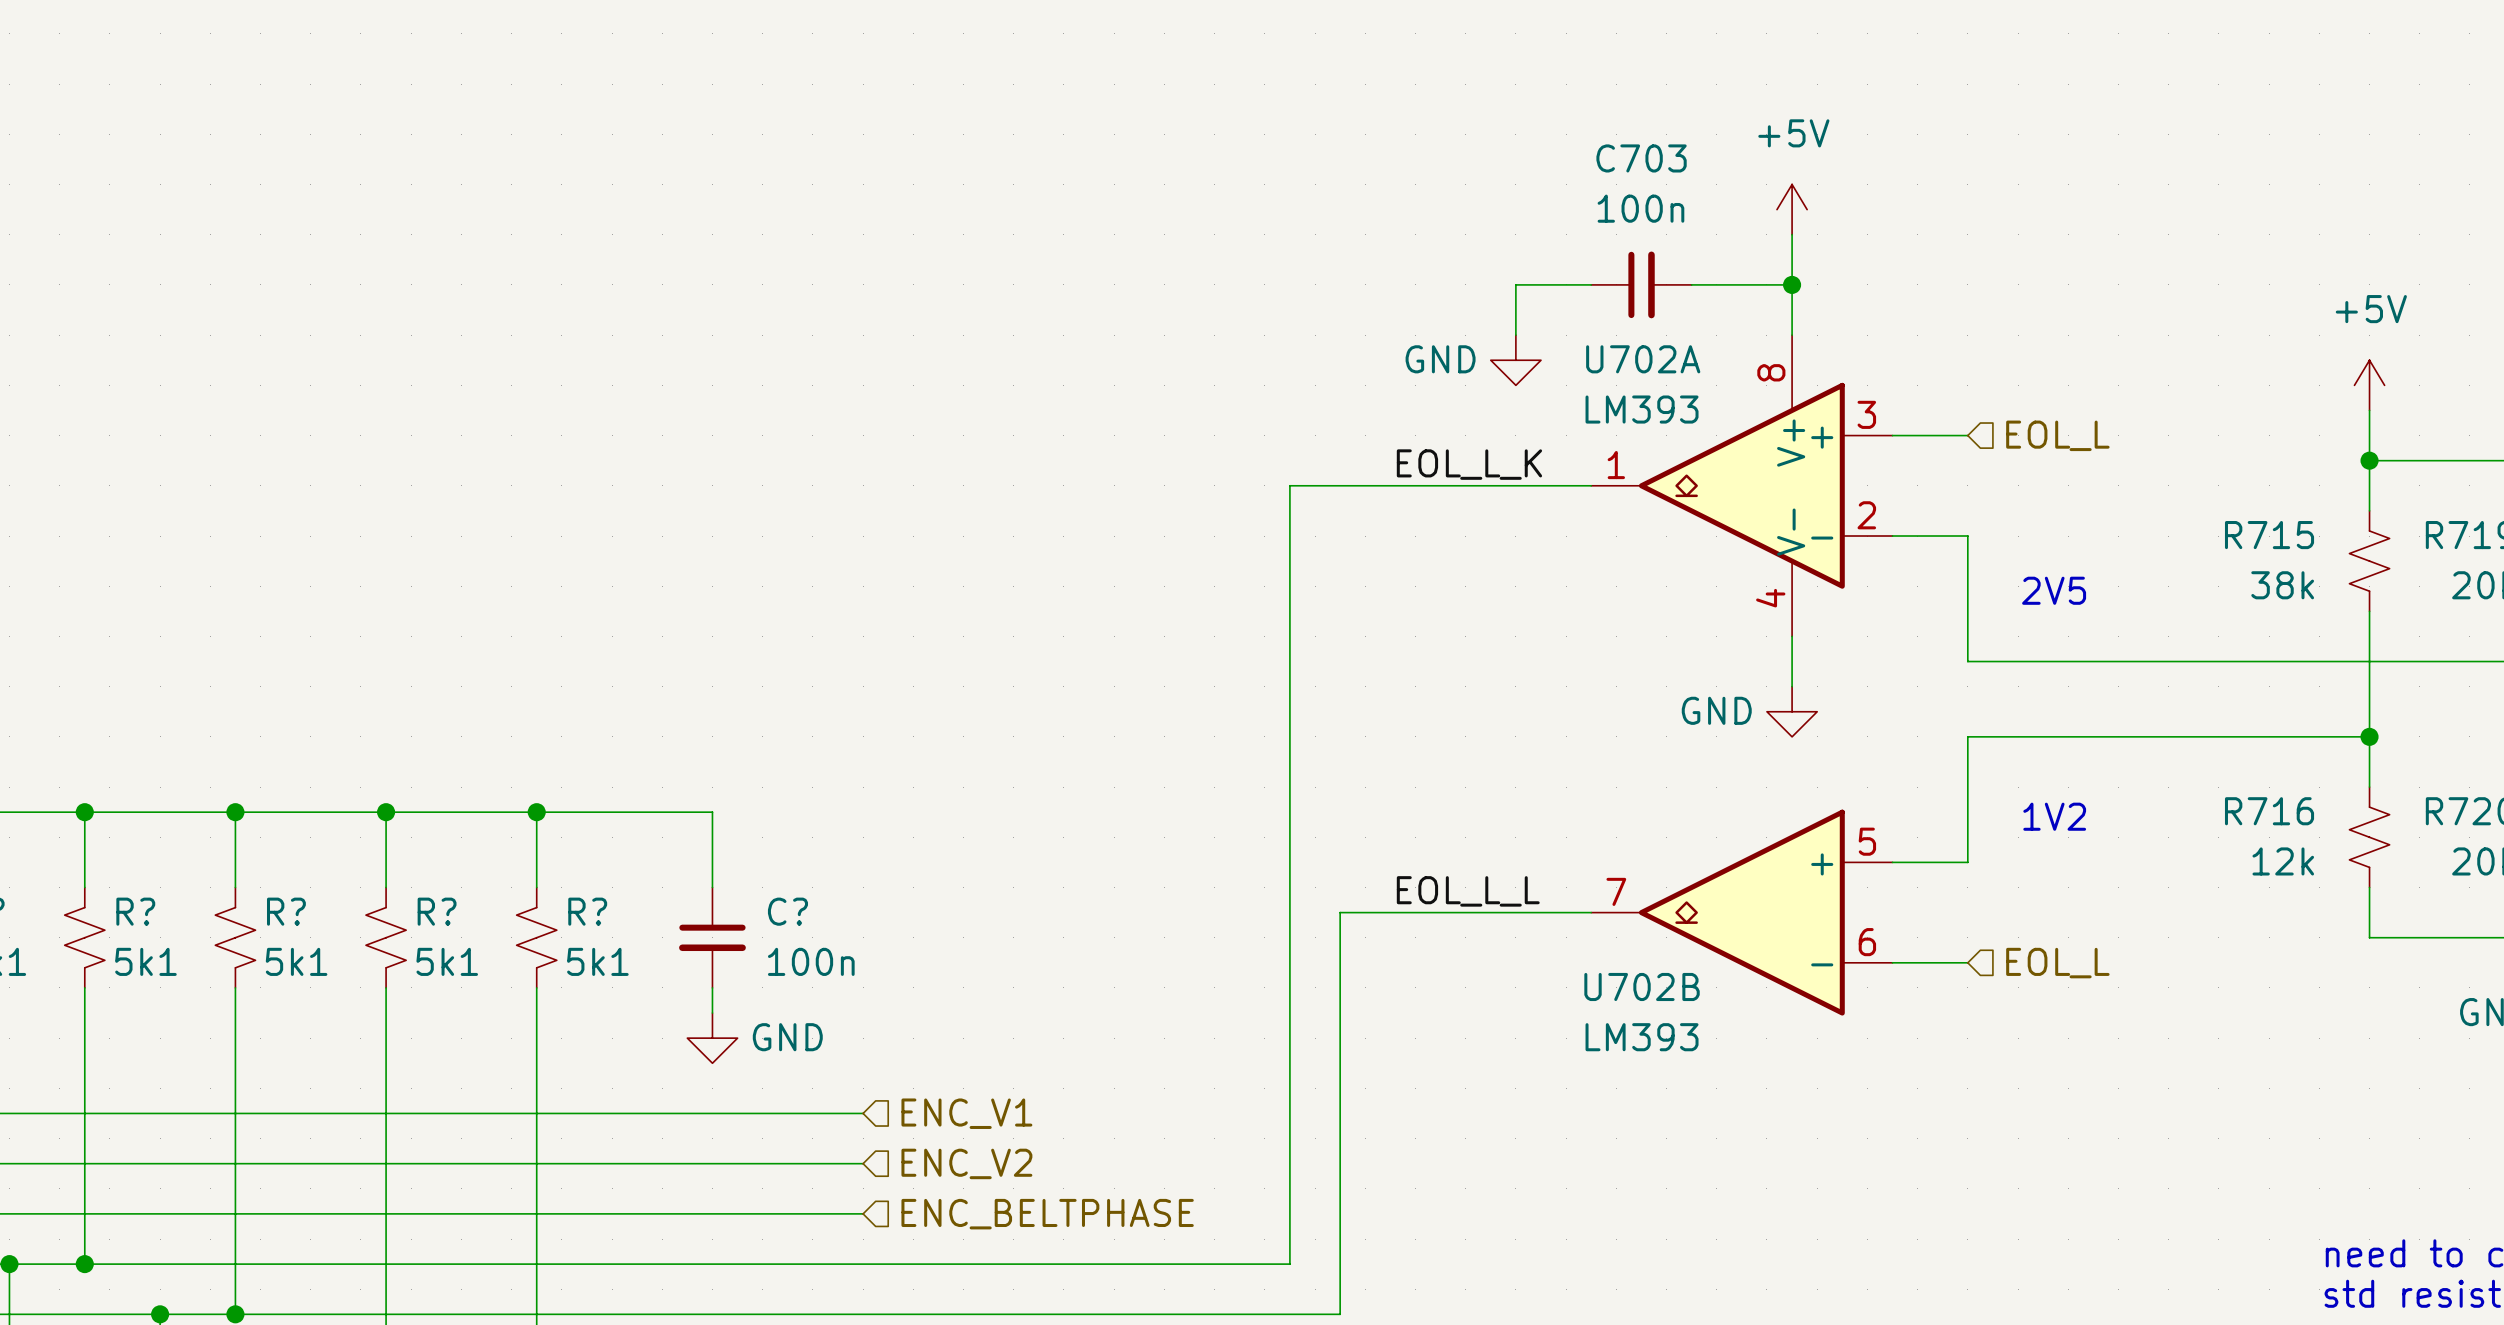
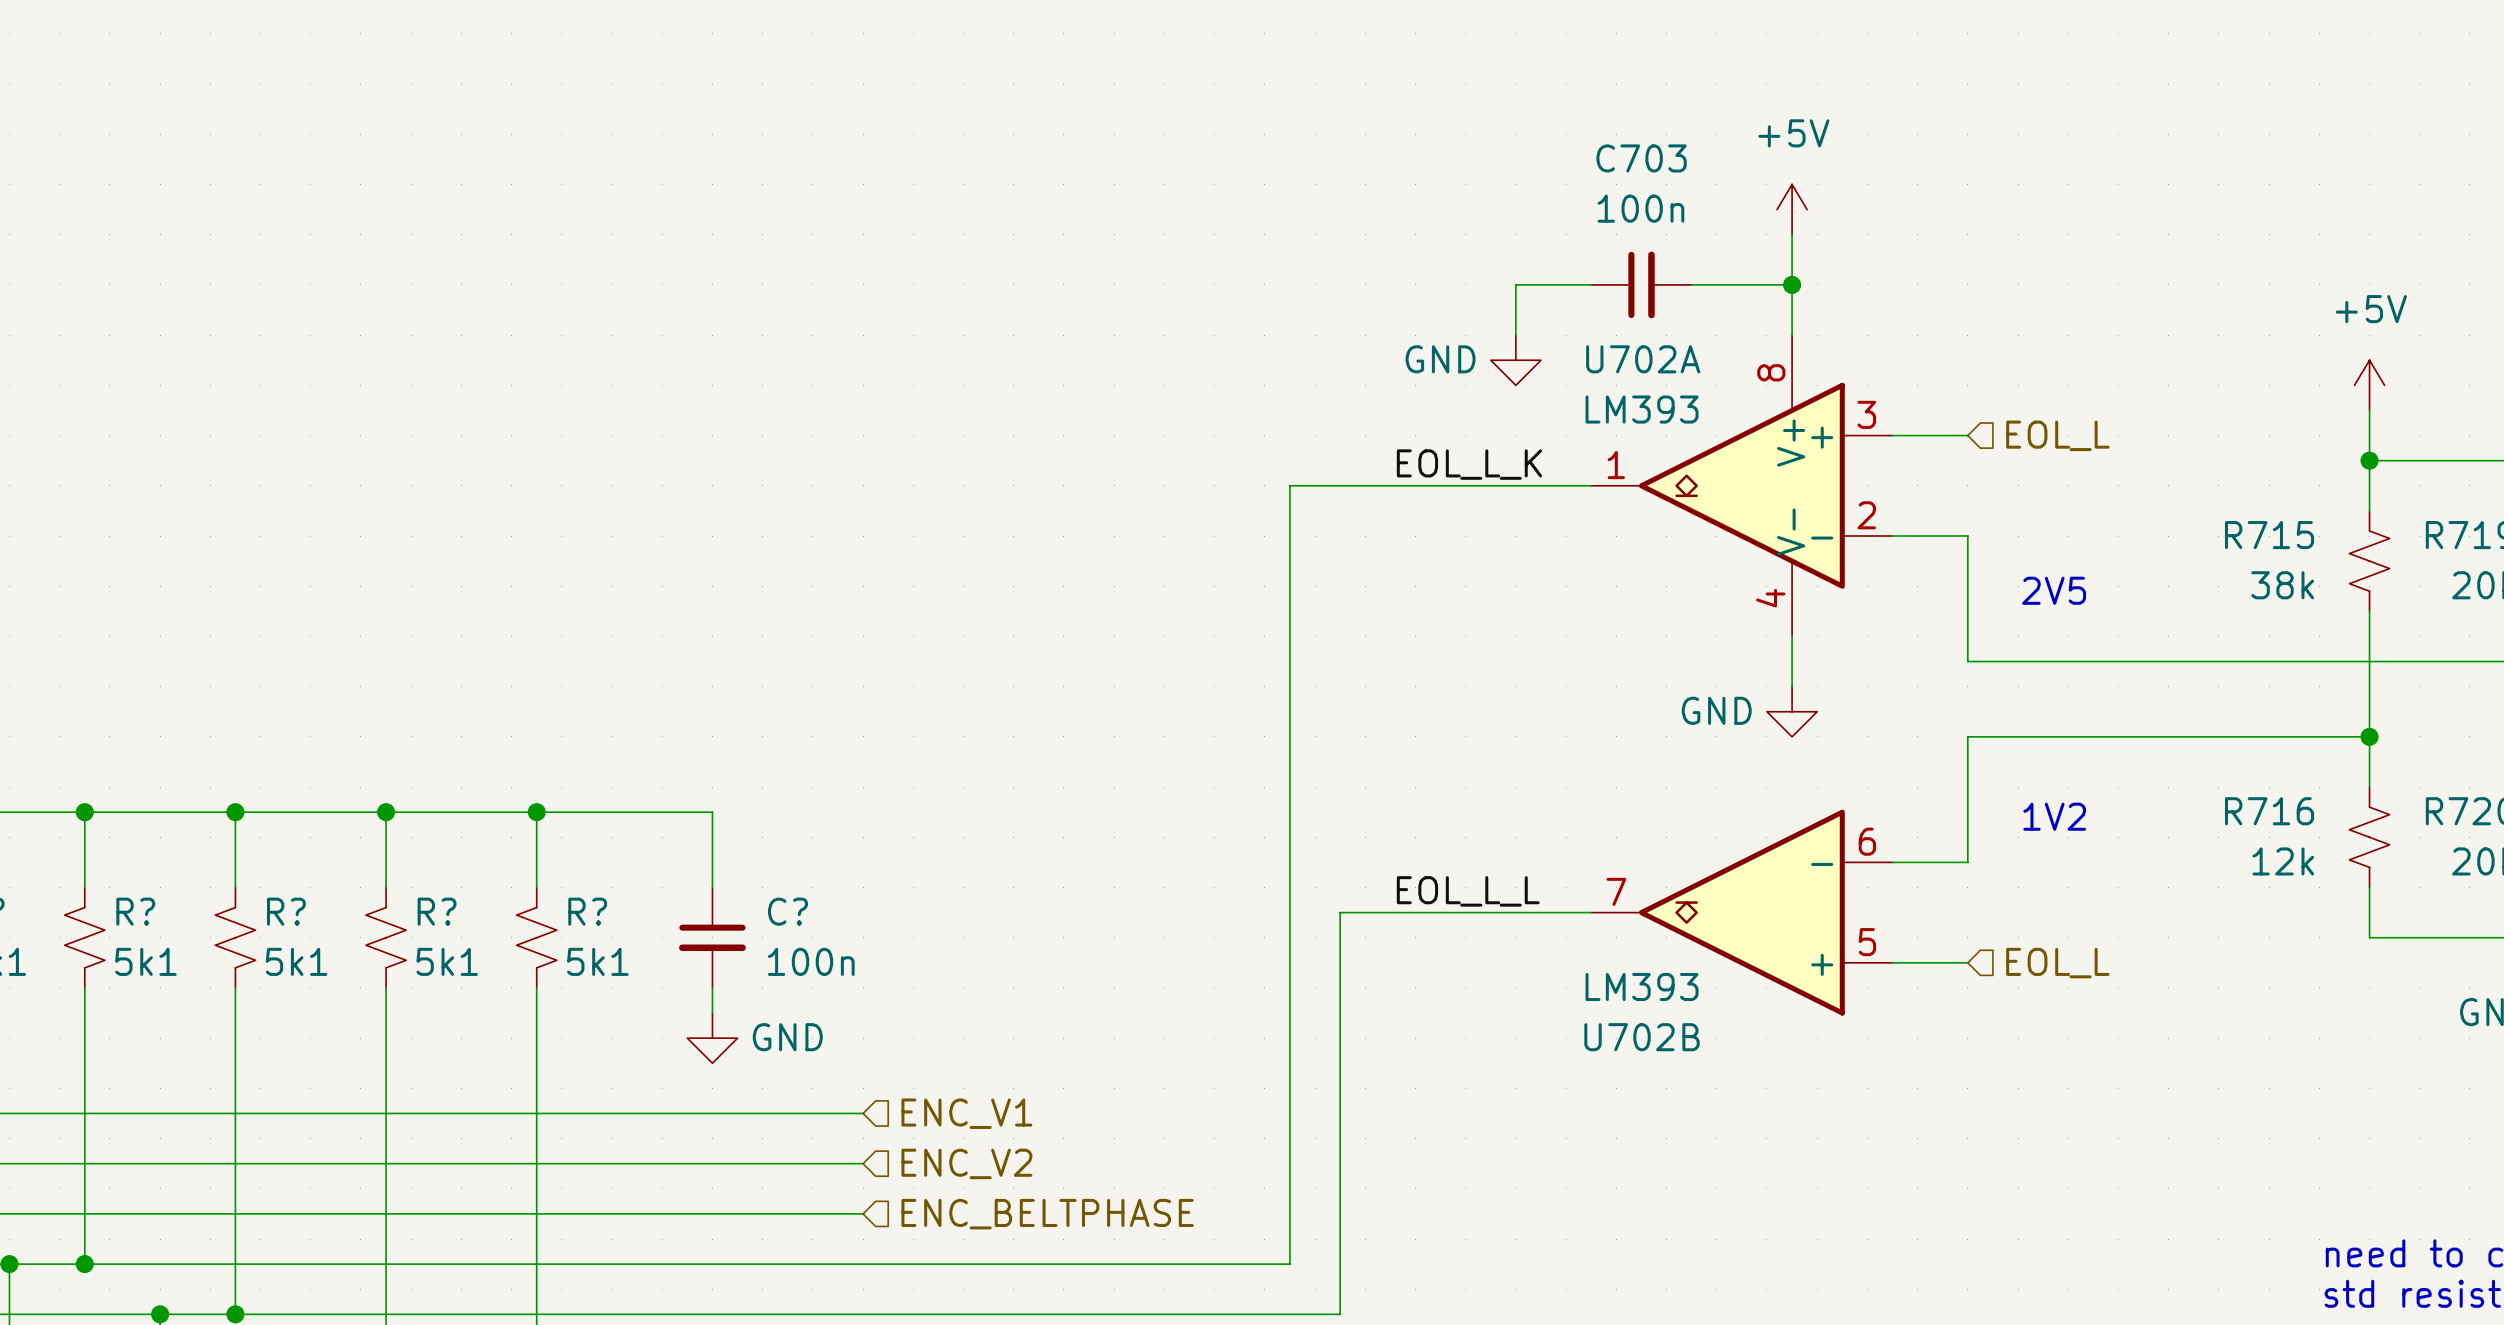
U702B flip: as is (1741, 912) -> up-down (1741, 912)
U702B name position: U702B (1642, 986) -> U702B (1642, 1037)
U702B value position: LM393 (1642, 1037) -> LM393 (1642, 986)

